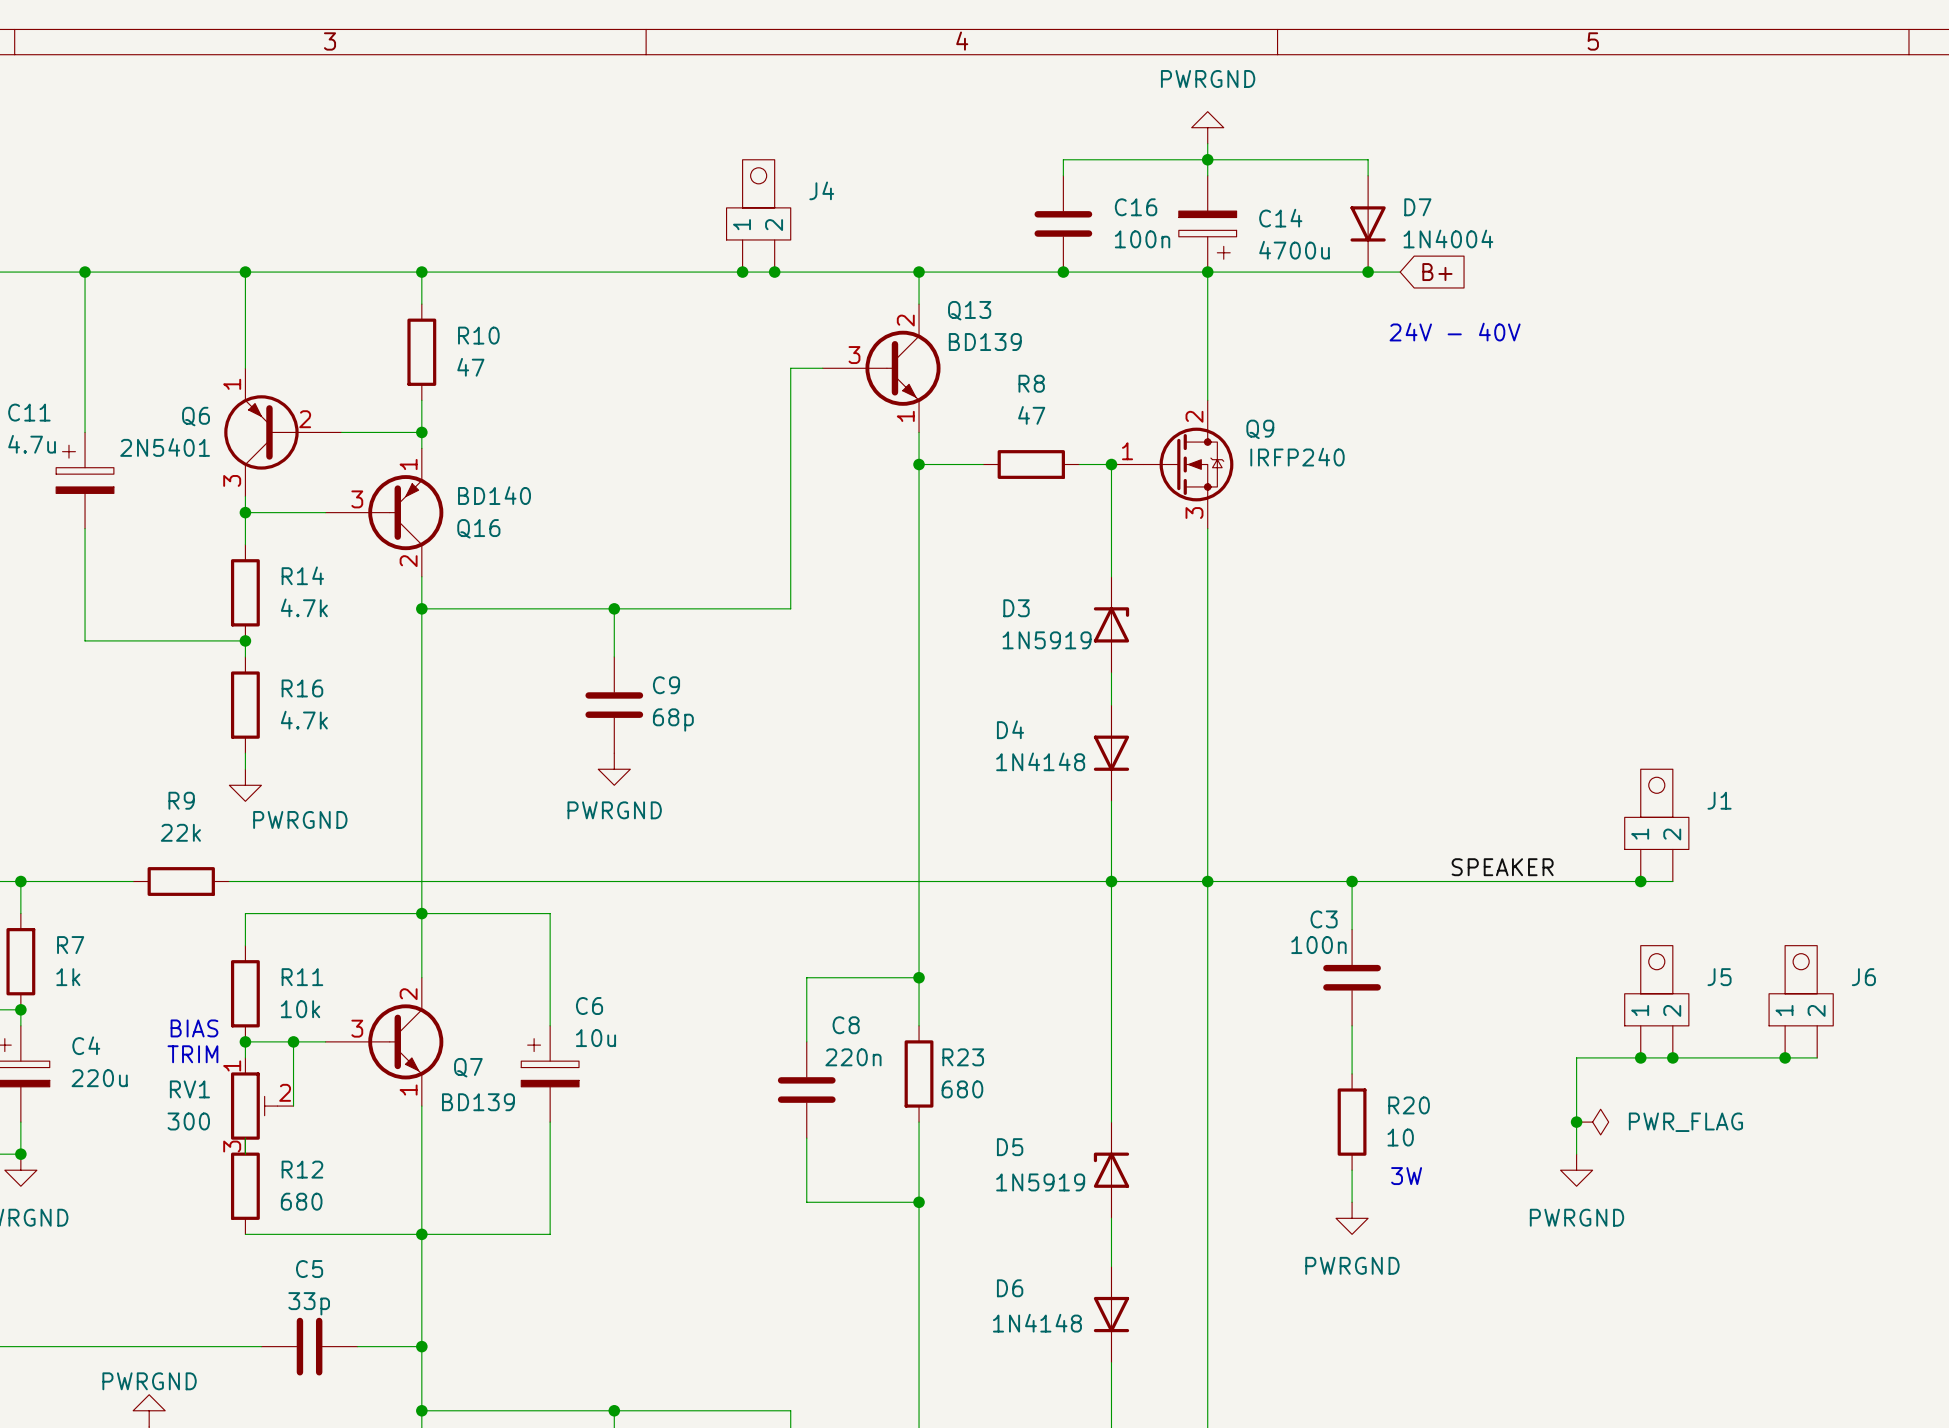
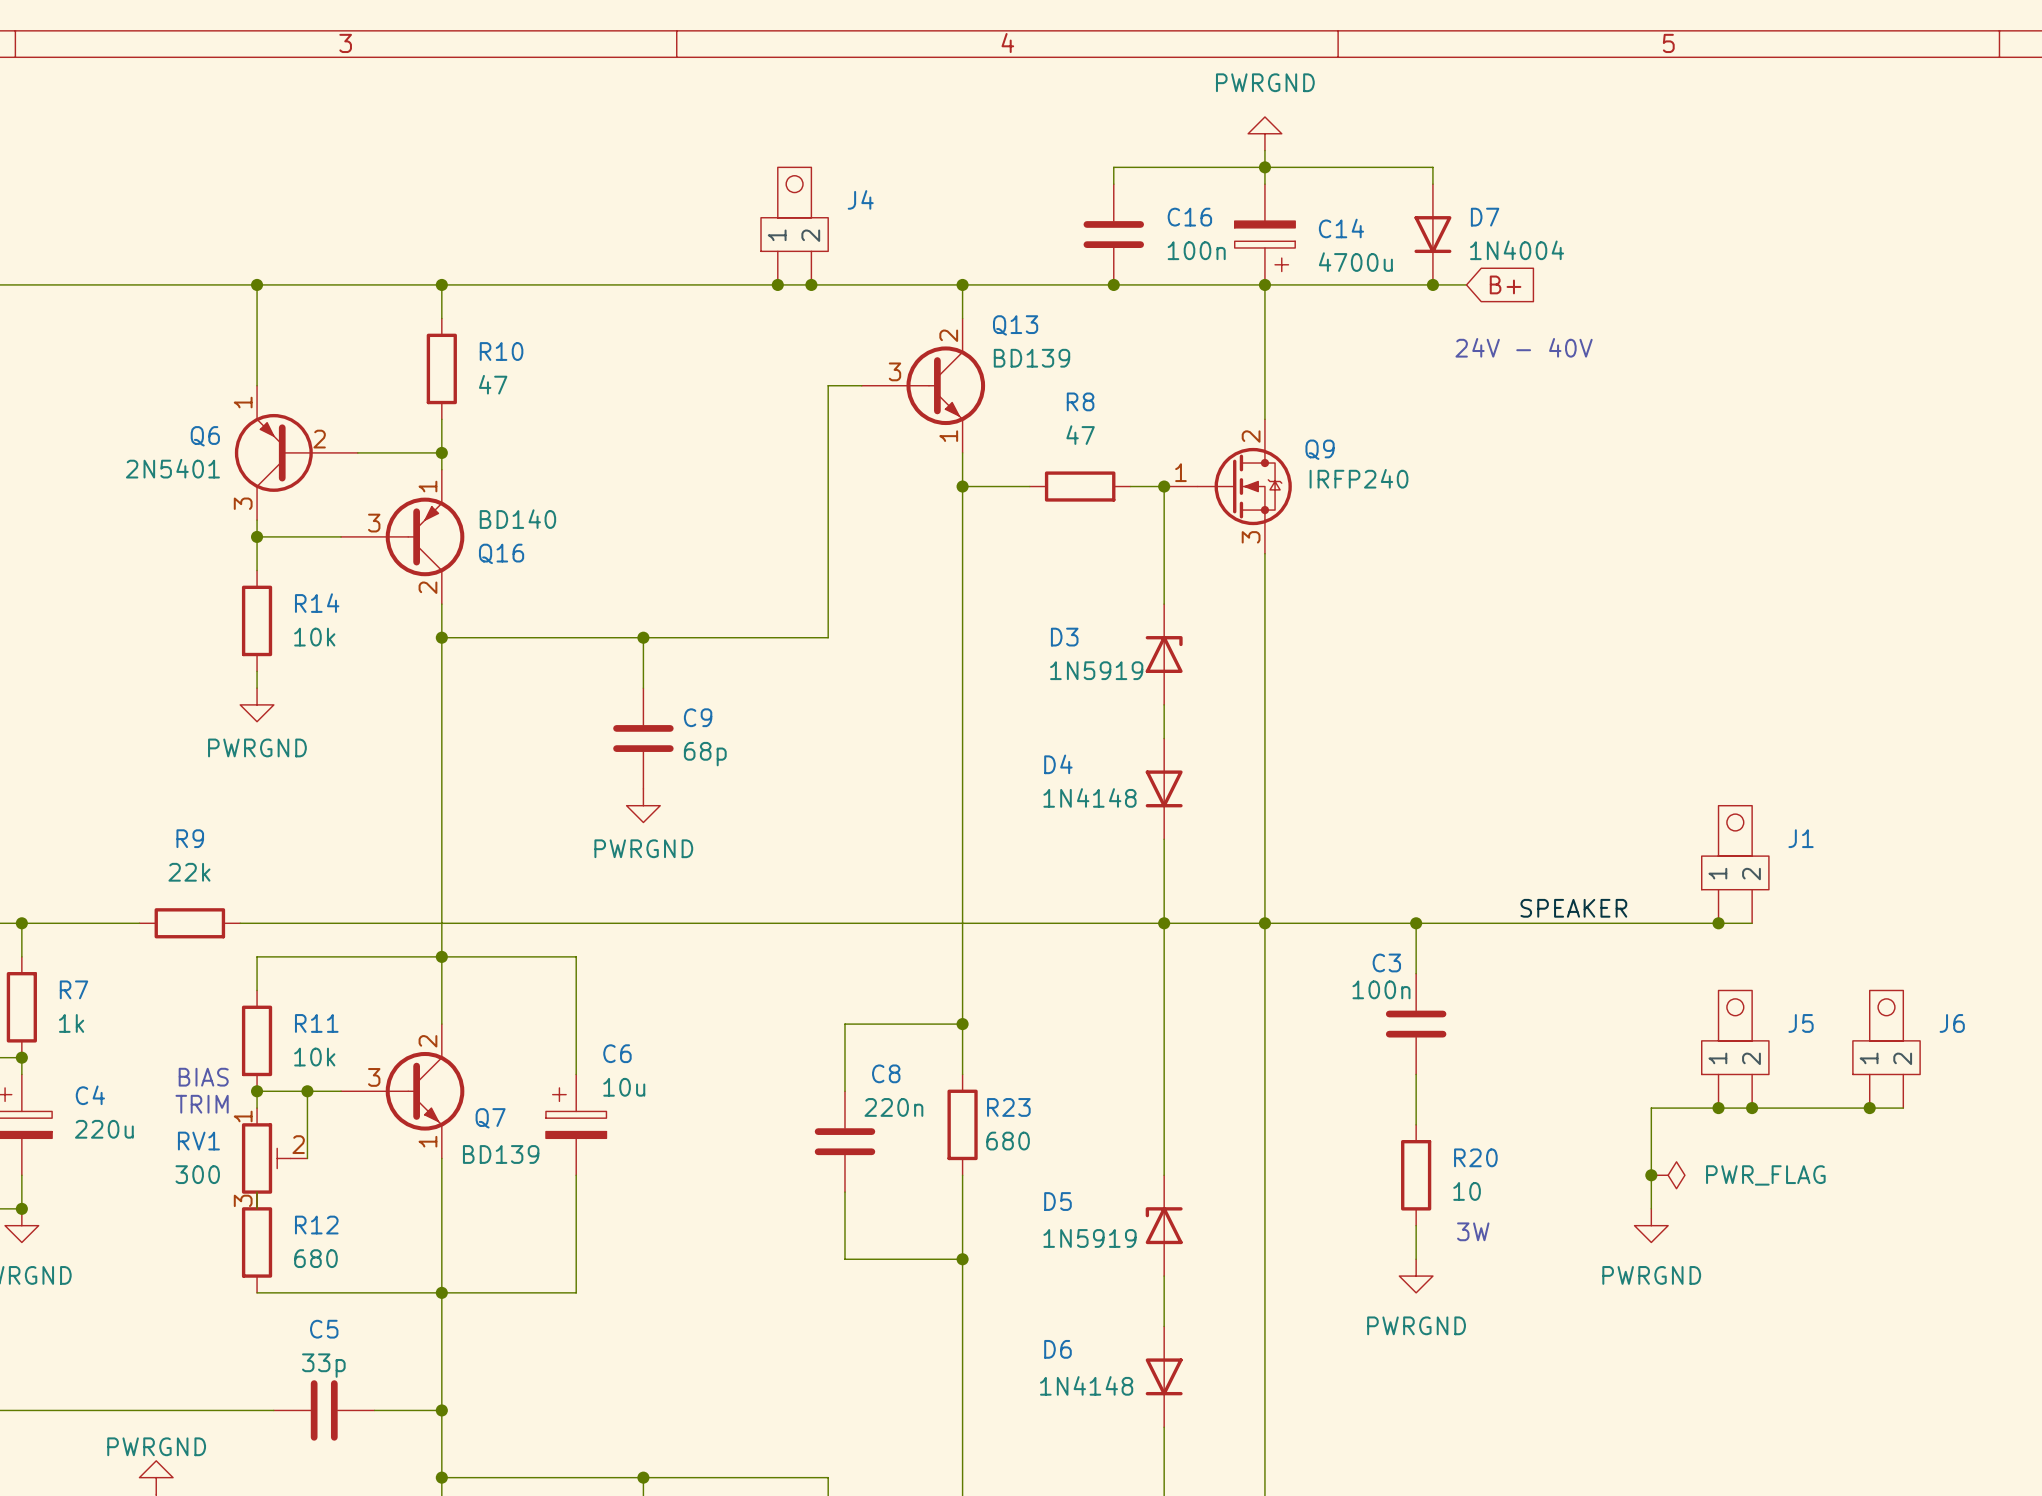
wire: (85, 272) (85, 432) -> none
junction: (85, 272) -> none
C11: 4.7u (85, 480) -> none
wire: (85, 528) (85, 640) (245, 640) -> none
R14 value: 4.7k (304, 607) -> 10k (314, 637)
junction: (245, 640) -> none
R16: 4.7k (245, 705) -> none
wire: (245, 753) (245, 769) -> none
power symbol position: PWRGND (245, 785) -> PWRGND (257, 704)
power symbol text position: PWRGND (300, 819) -> PWRGND (257, 747)

